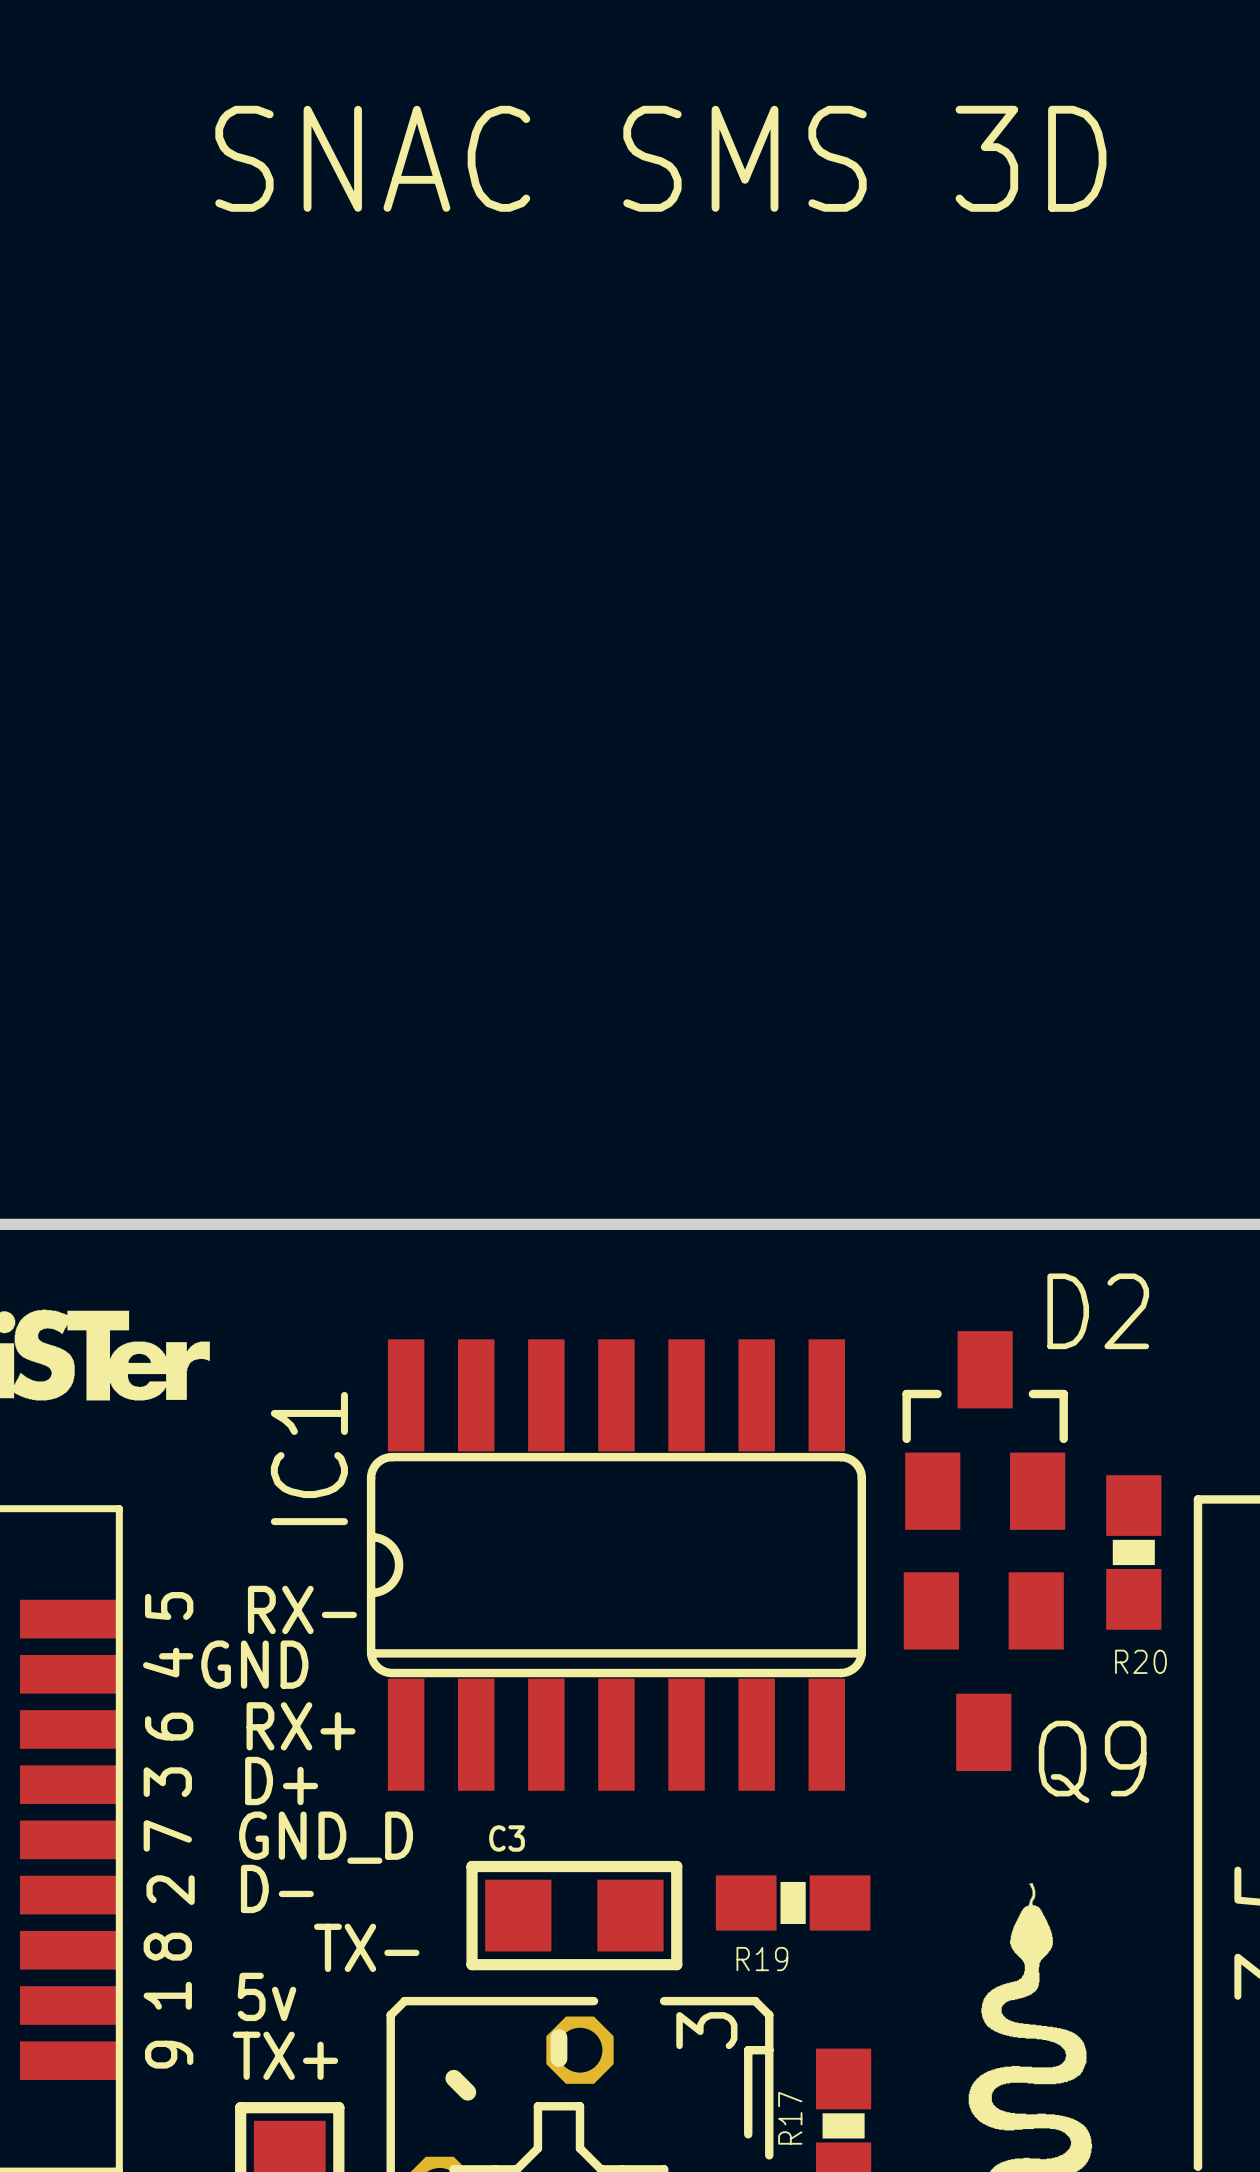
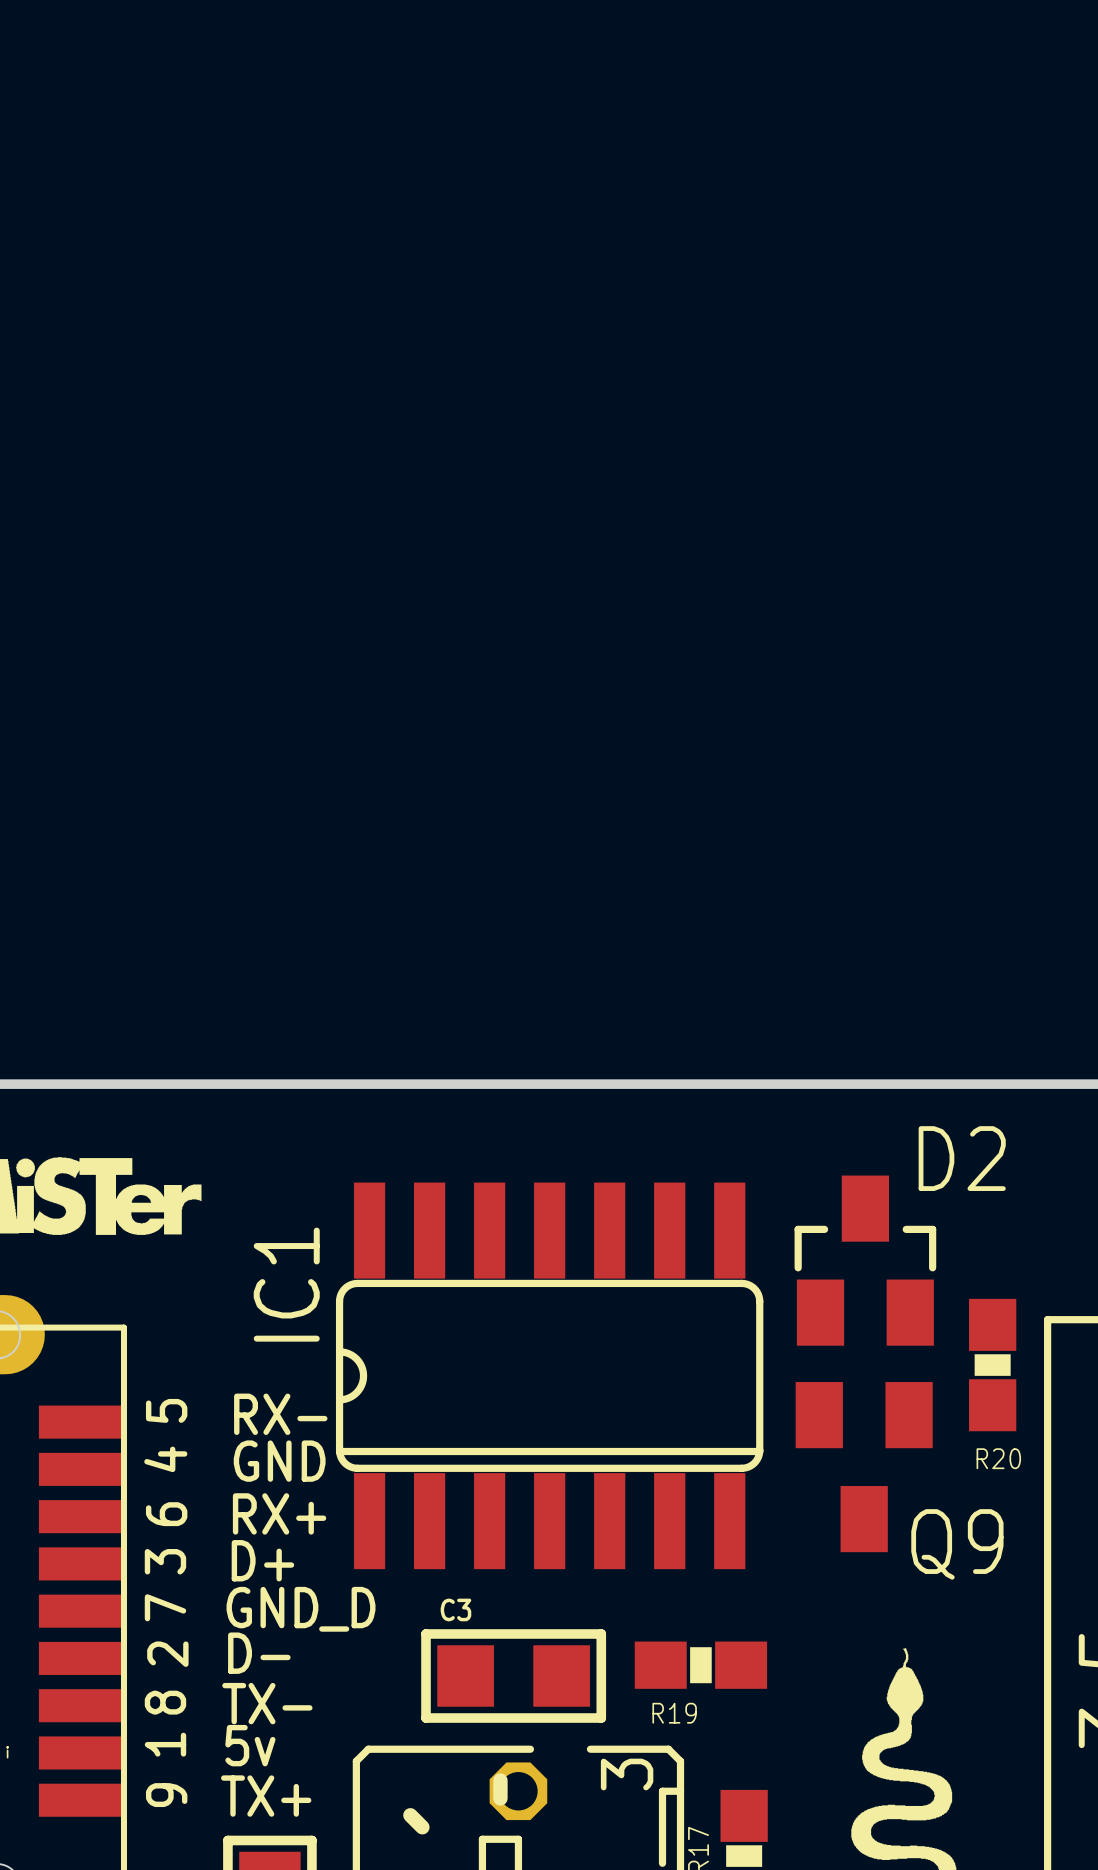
text: SNAC SMS 3D (660, 158) -> none
text position: GND (254, 1664) -> GND (279, 1461)
text position: TX- (366, 1947) -> TX- (267, 1703)

